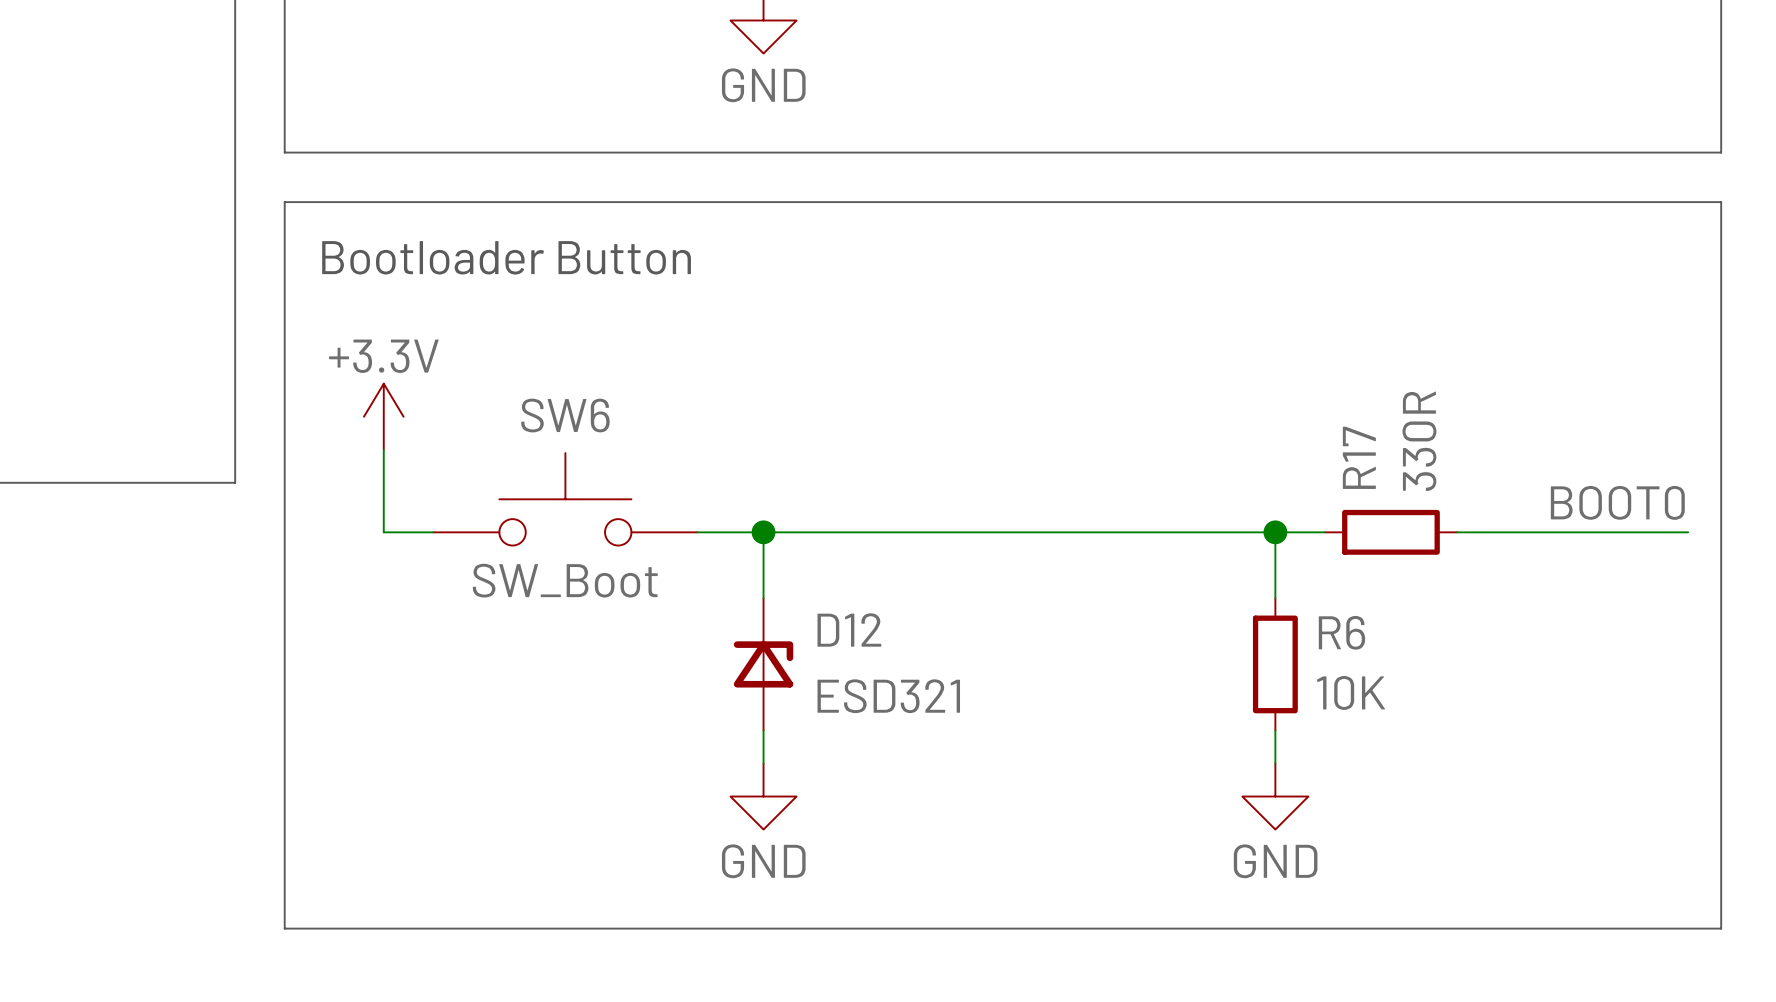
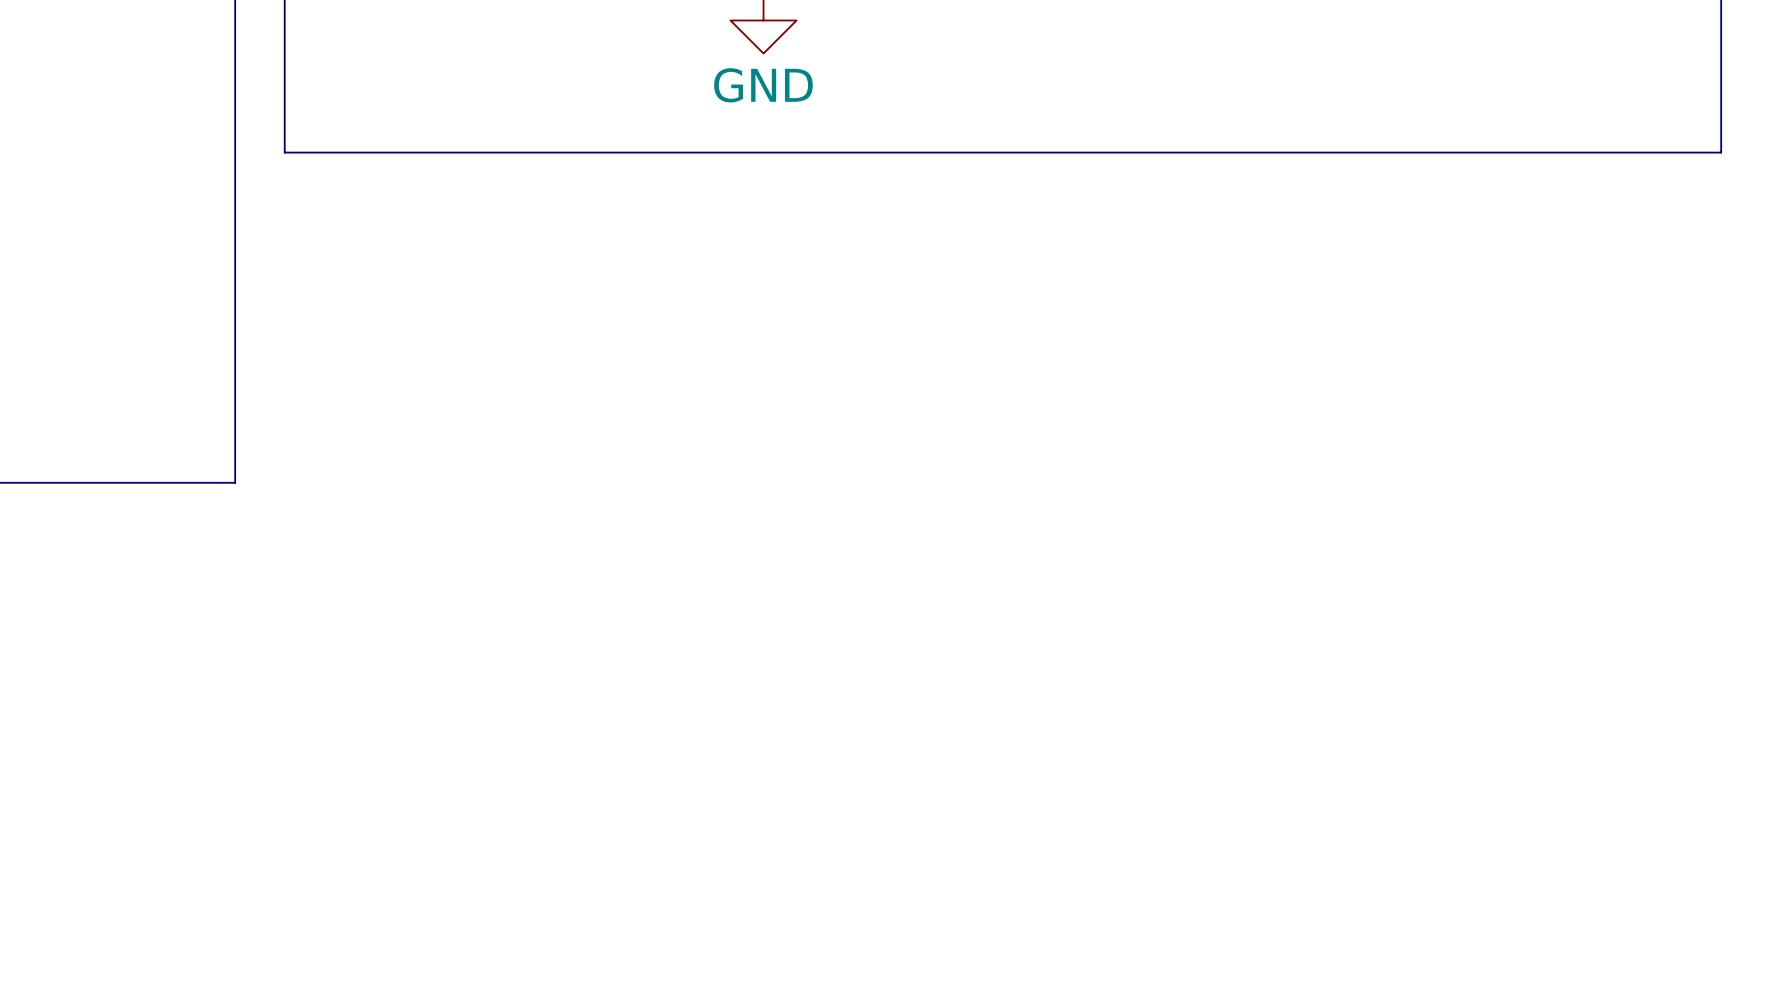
line: (284, 202) (284, 928) (1721, 928) (1721, 202) (284, 202) -> none
text: Bootloader Button (506, 257) -> none
power symbol: +3.3V (383, 416) -> none
wire: (383, 449) (383, 532) (433, 532) -> none
SW6: SW_Boot (565, 499) -> none
label: BOOT0 (1617, 502) -> none
wire: (697, 532) (1324, 532) -> none
wire: (763, 532) (763, 598) -> none
junction: (763, 532) -> none
wire: (1275, 532) (1275, 598) -> none
junction: (1275, 532) -> none
R17: 330R (1390, 532) -> none
wire: (1457, 532) (1688, 532) -> none
D12: ESD321 (763, 664) -> none
R6: 10K (1275, 664) -> none
wire: (763, 730) (763, 763) -> none
wire: (1275, 730) (1275, 763) -> none
power symbol: GND (763, 796) -> none
power symbol: GND (1275, 796) -> none

